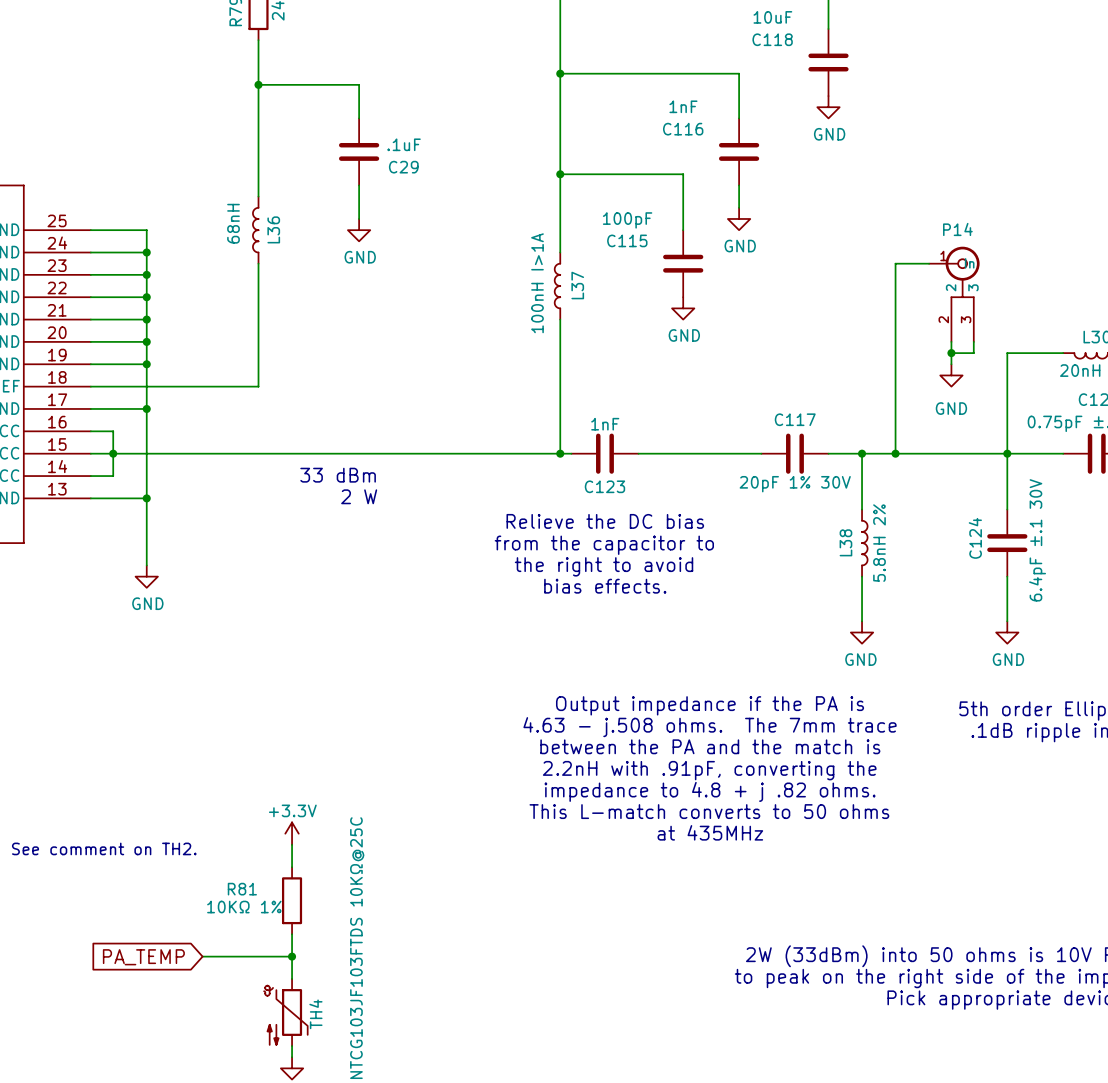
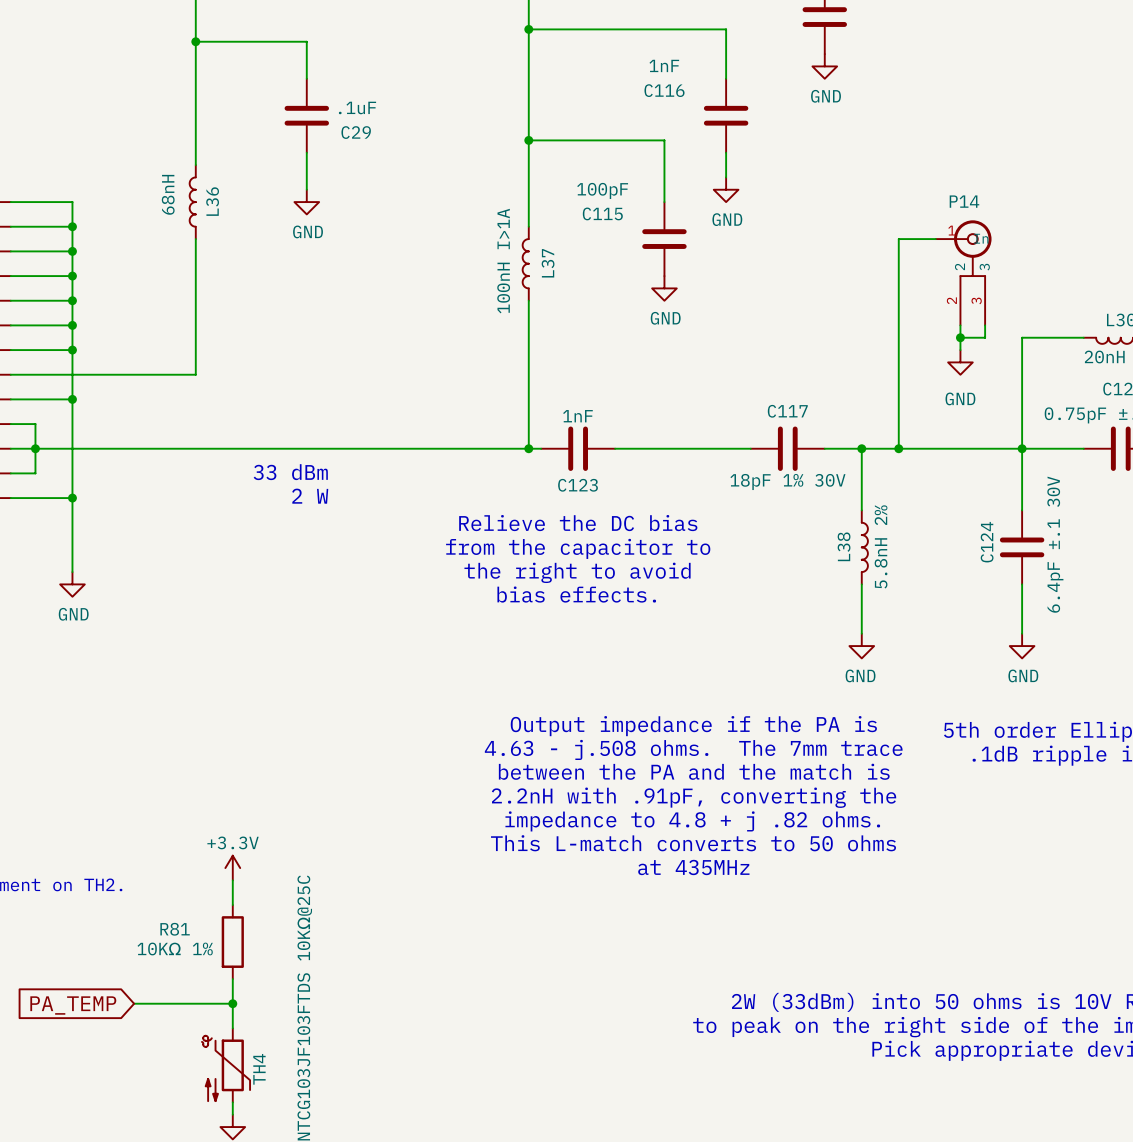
C117 value: 20pF 1% 30V (795, 484) -> 18pF 1% 30V (787, 482)

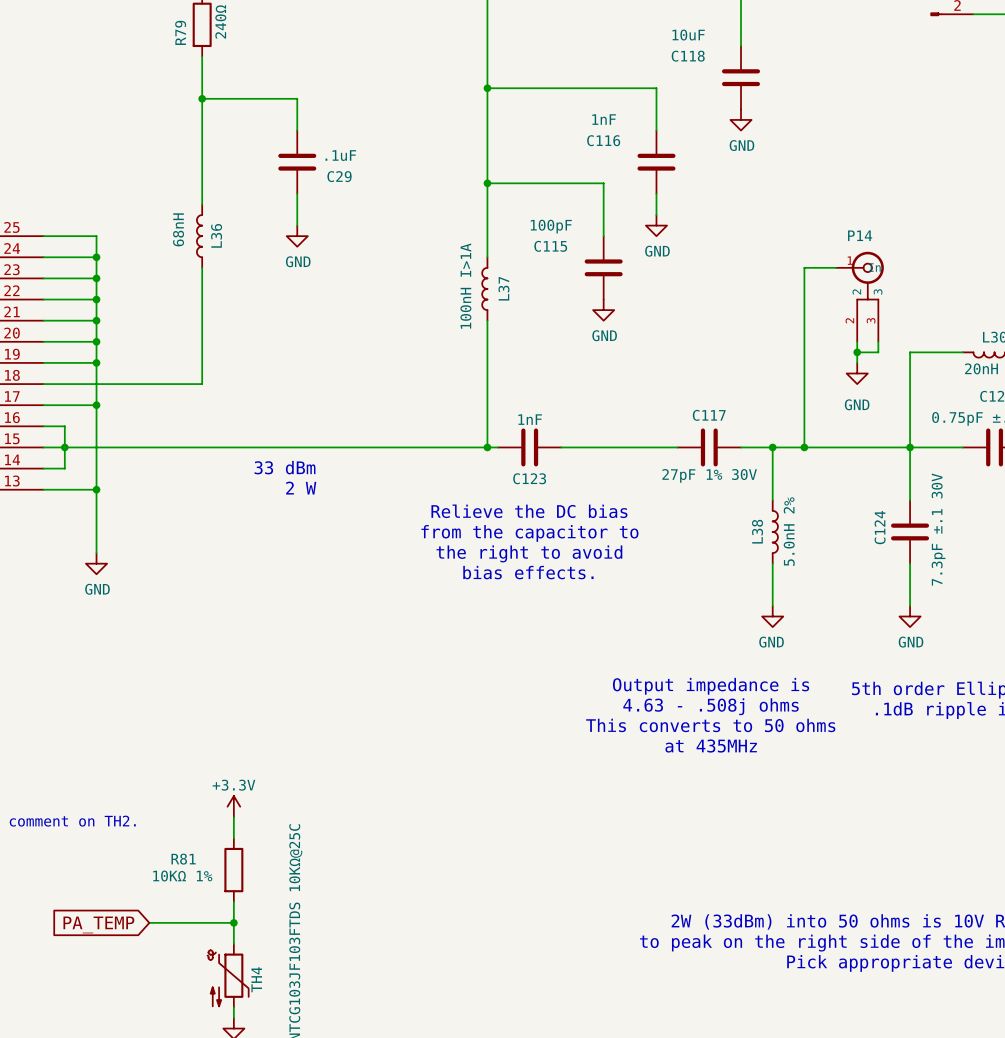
C117 value: 18pF 1% 30V (787, 482) -> 27pF 1% 30V (709, 475)
C124 value: 6.4pF ±.1 30V (1055, 544) -> 7.3pF ±.1 30V (938, 529)
L38 value: 5.8nH 2% (881, 546) -> 5.0nH 2% (789, 531)
text: Output impedance if the PA is (693, 726) -> Output impedance is (711, 686)
text: 4.63 - j.508 ohms. The 7mm trace (693, 749) -> 4.63 - .508j ohms (710, 706)
text: between the PA and the match is (694, 771) -> none
text: none -> This converts to 50 ohms (710, 725)
text: 2.2nH with .91pF, converting the (694, 797) -> none
text: impedance to 4.8 + j .82 ohms. (692, 821) -> none
text: This L-match converts to 50 ohms (693, 843) -> none
text position: at 435MHz (693, 867) -> at 435MHz (711, 746)

